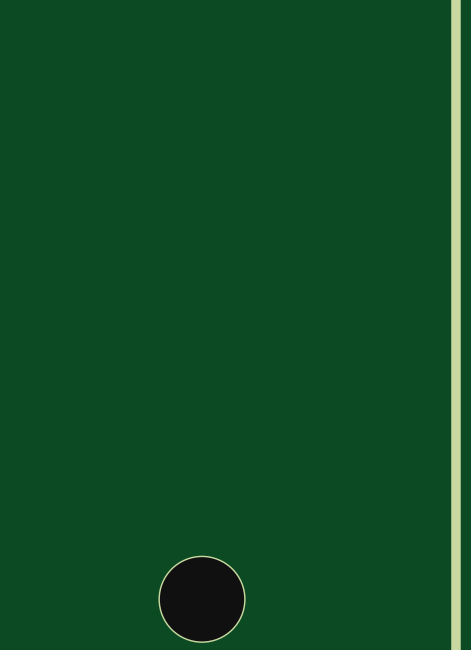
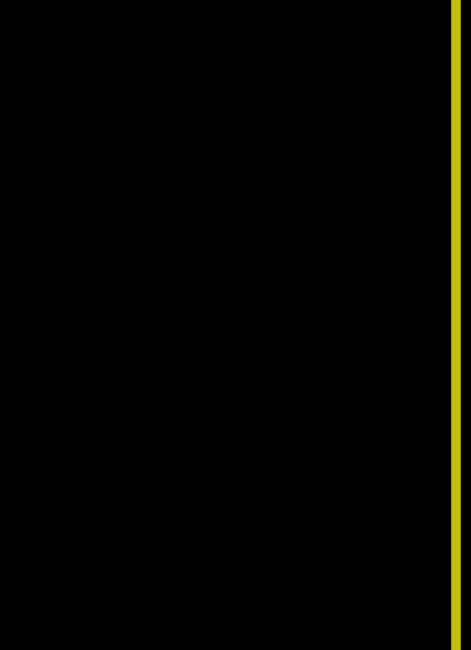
part: (202, 599) -> none

